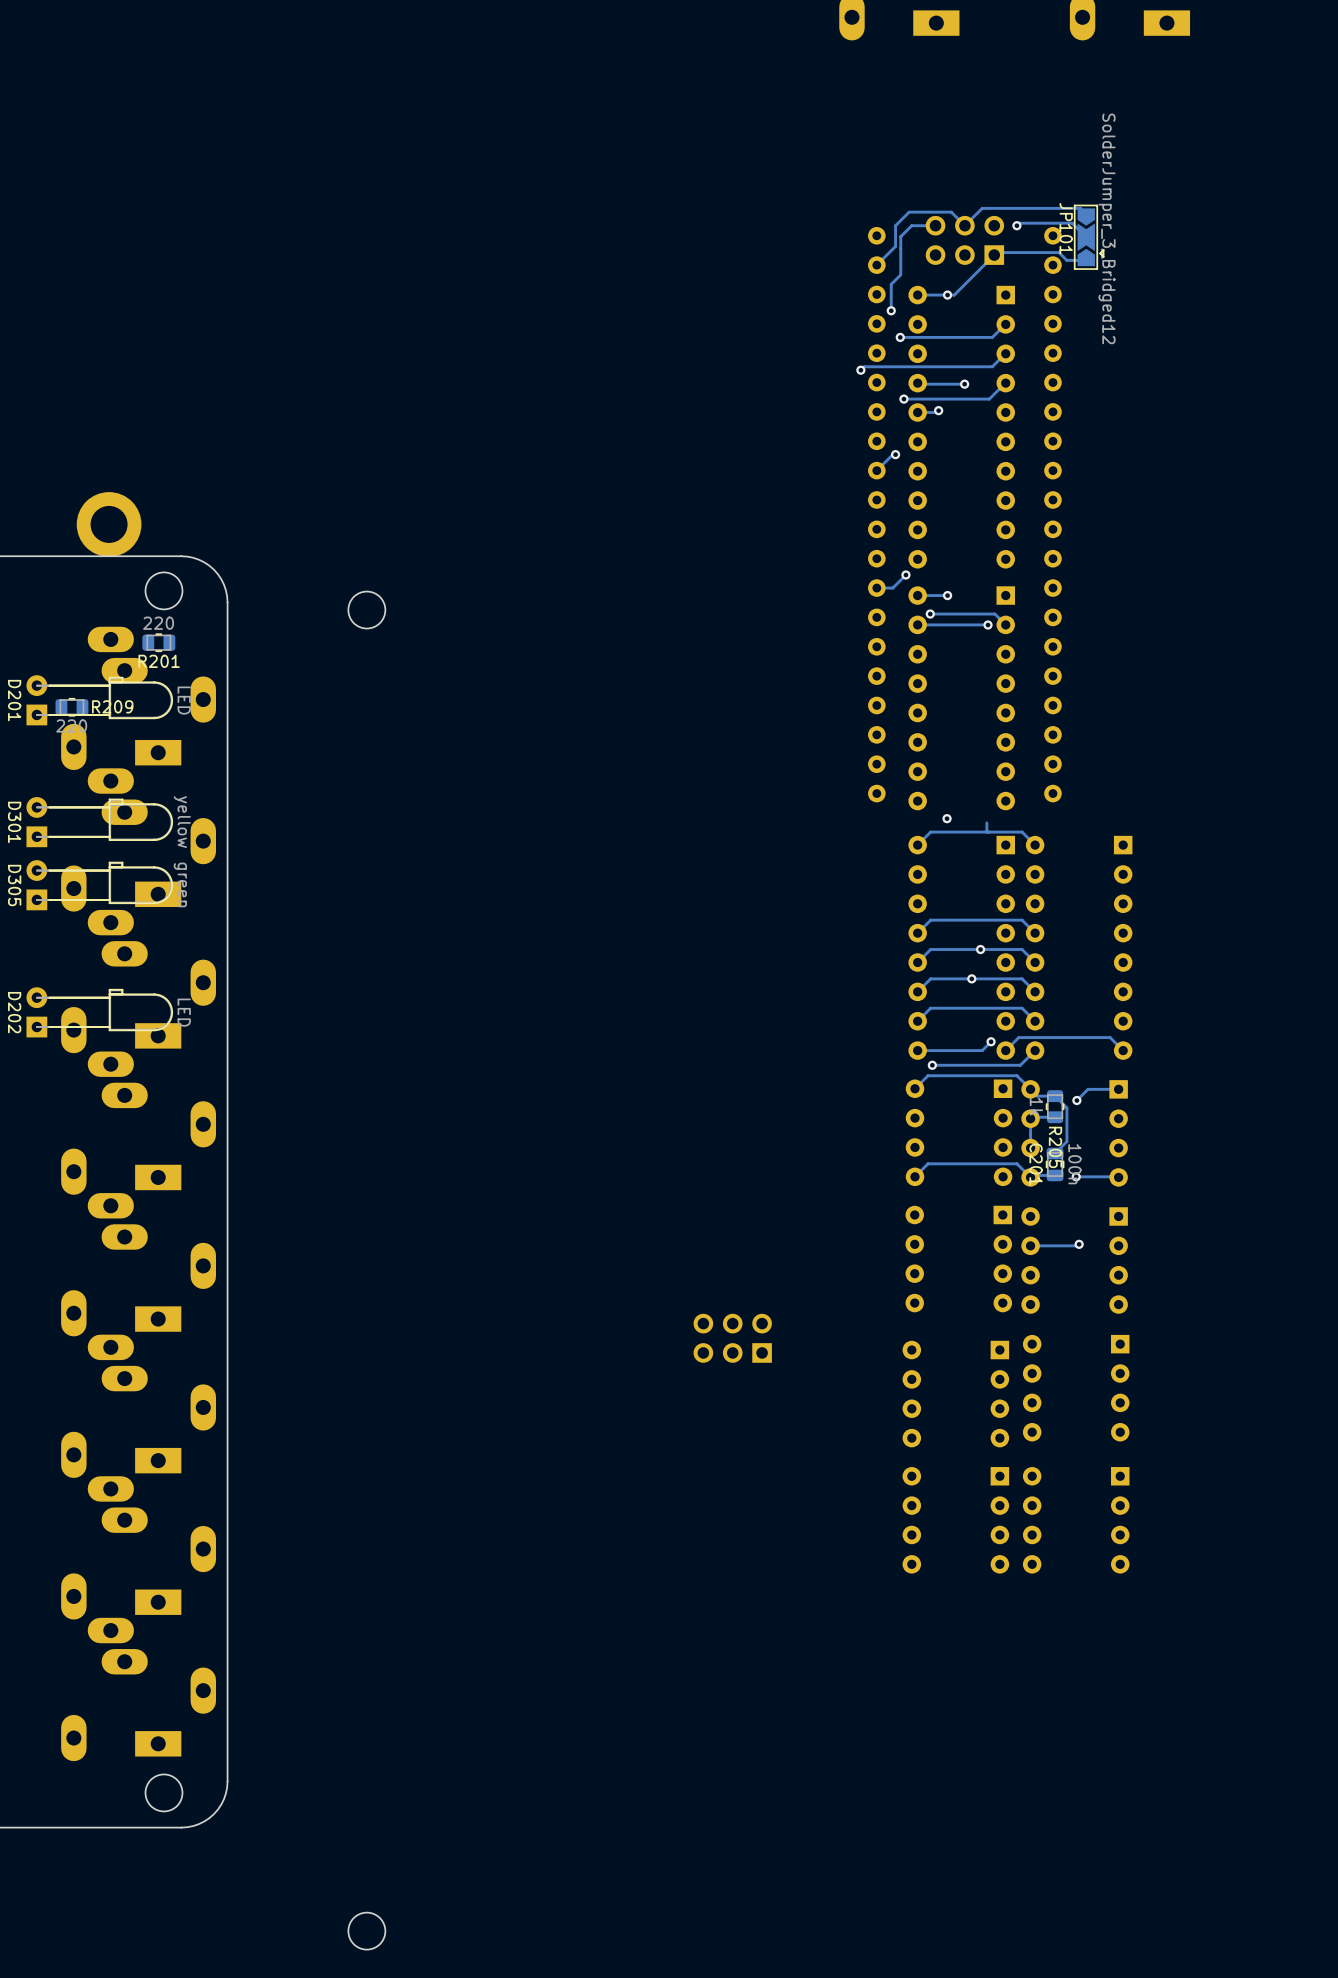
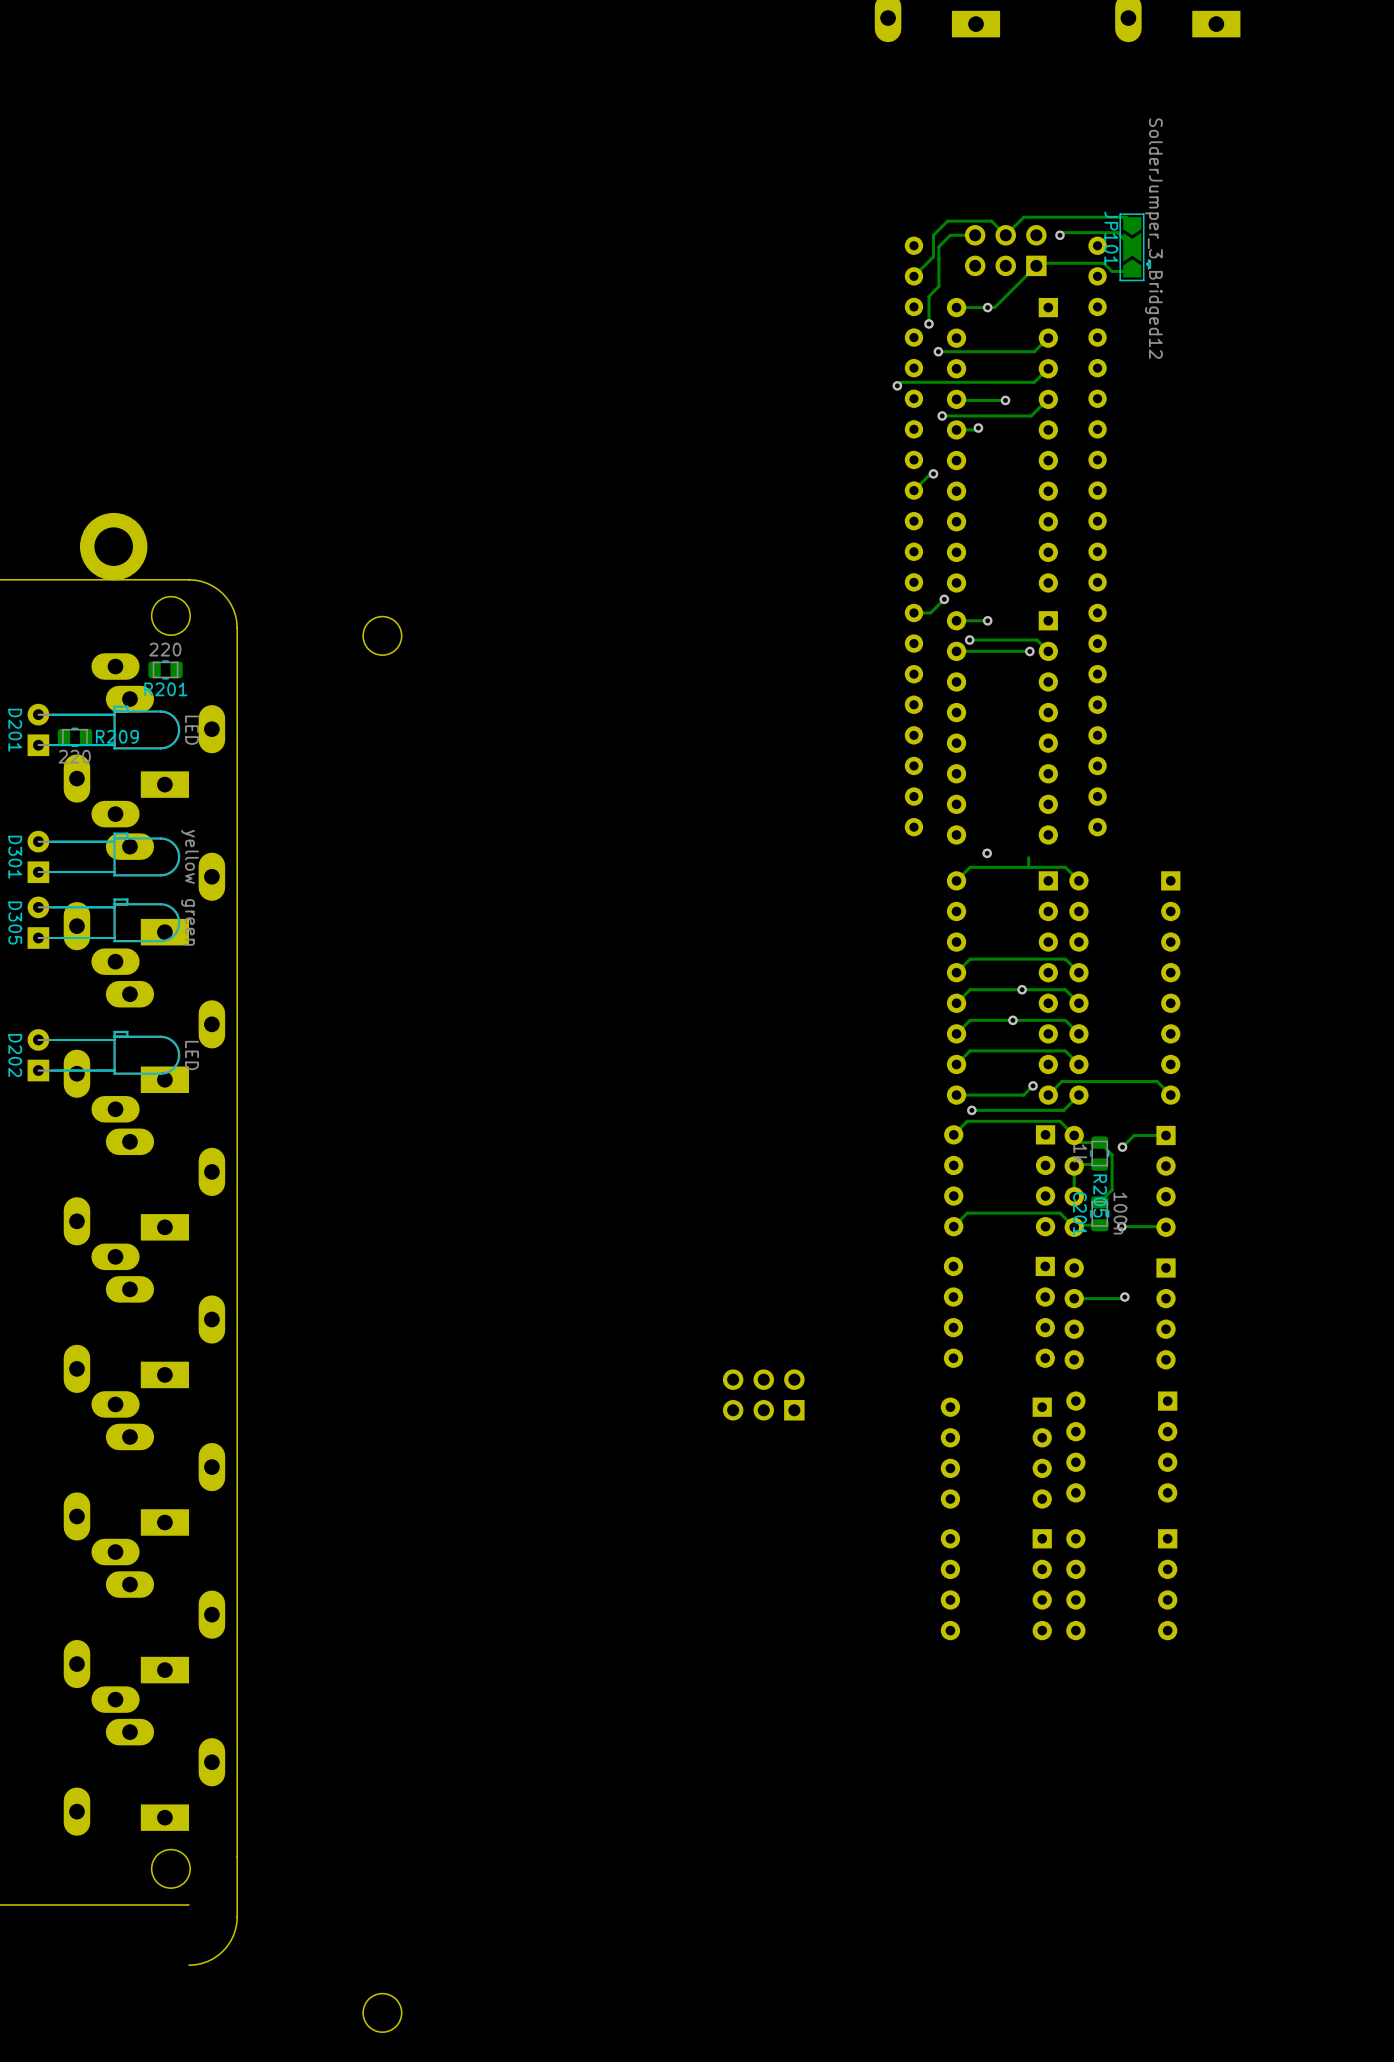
board edge: (227, 1781) (224, 1799) (214, 1814) (199, 1824) (181, 1827) -> (237, 1856) (237, 1917) (233, 1935) (227, 1946) (213, 1958) (201, 1963) (189, 1965)

